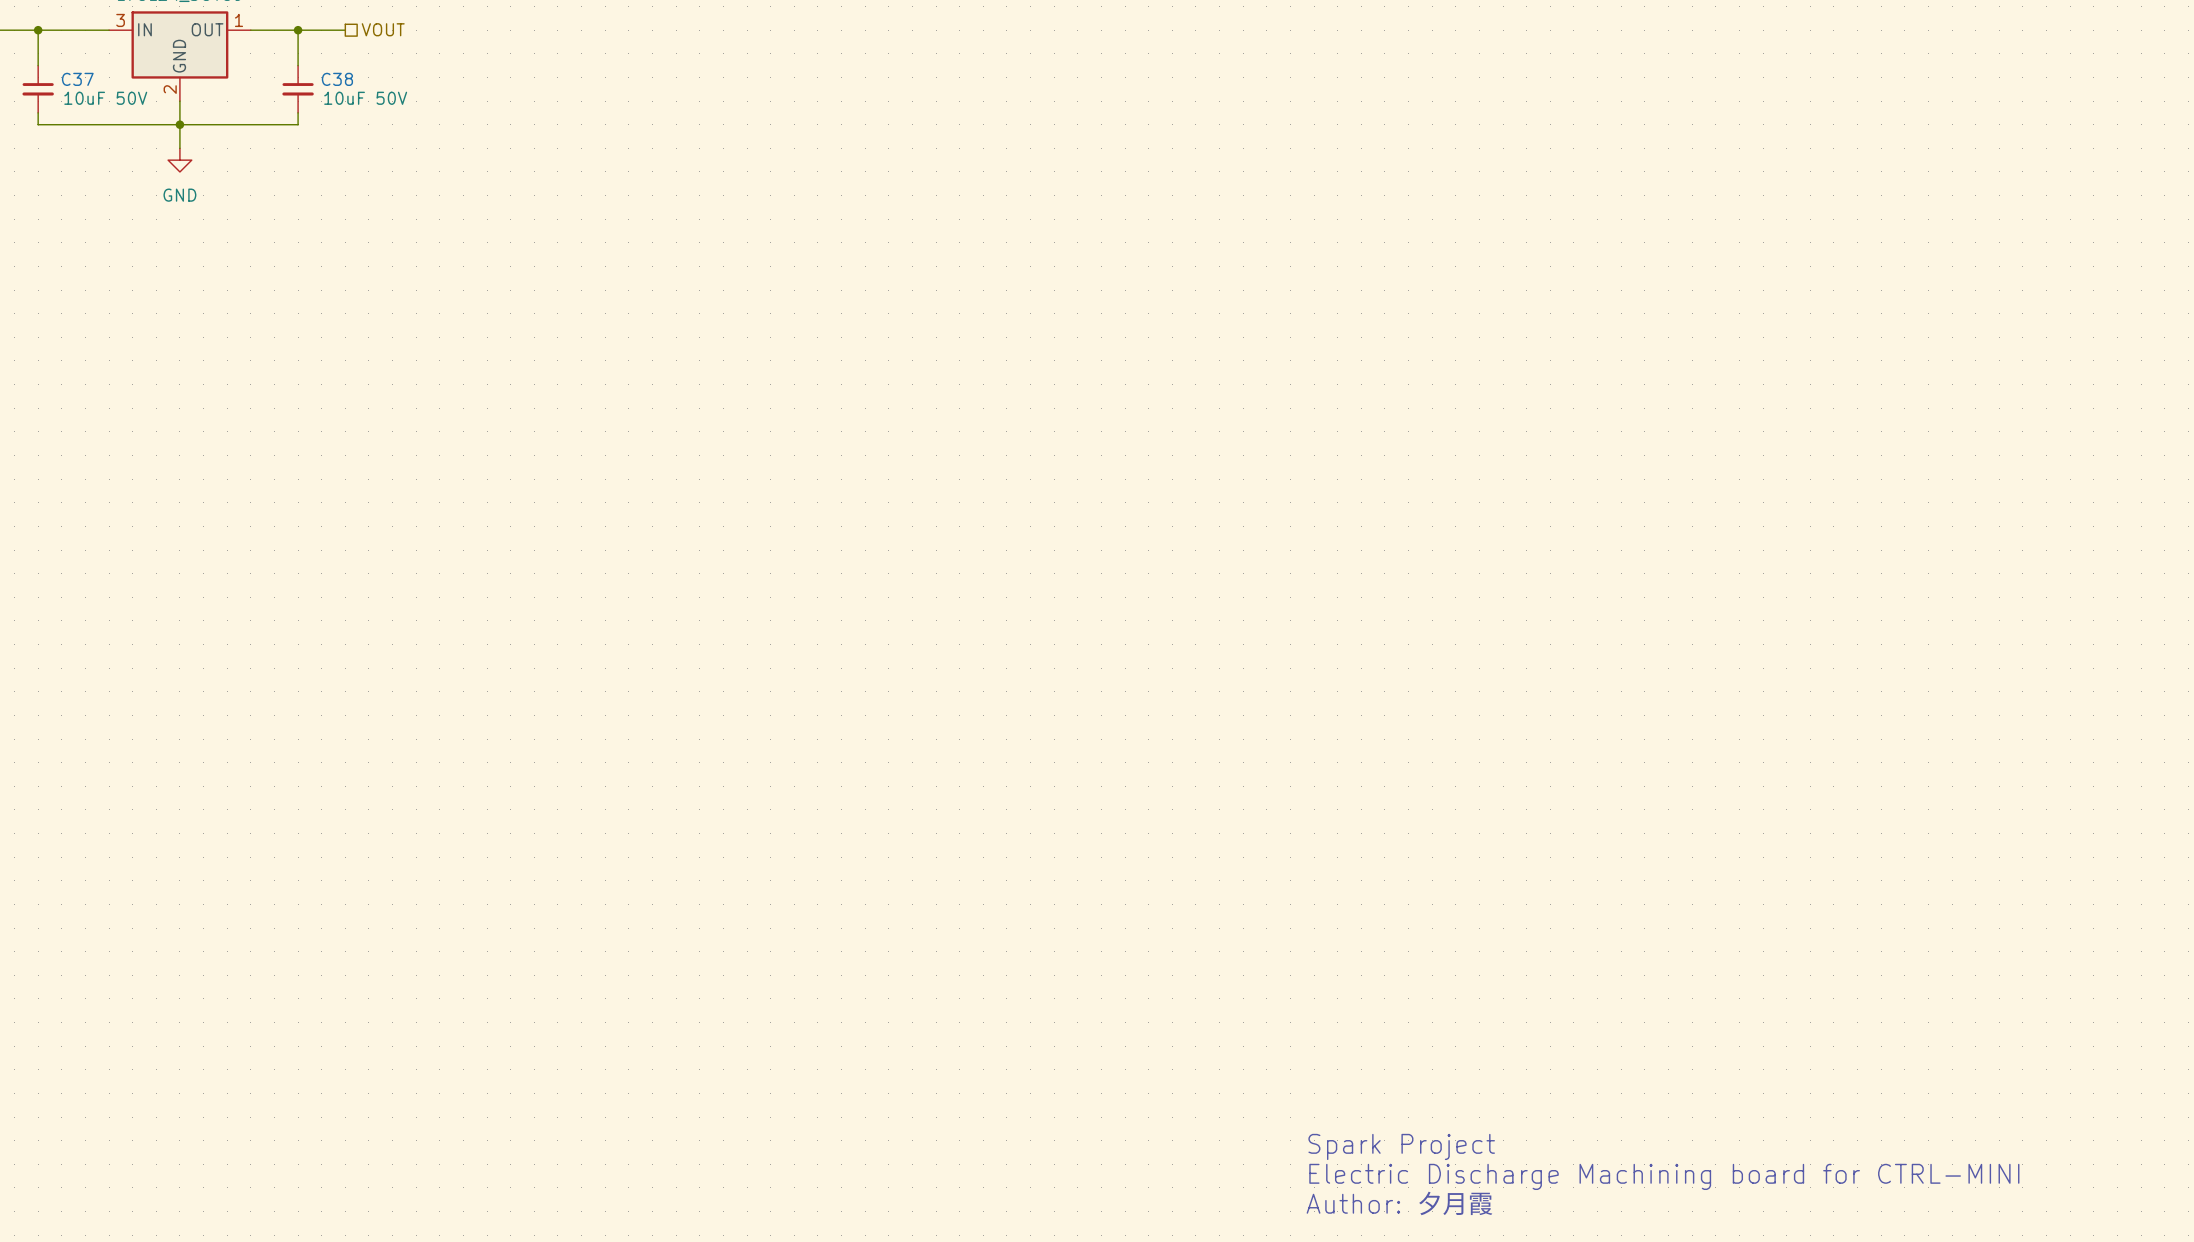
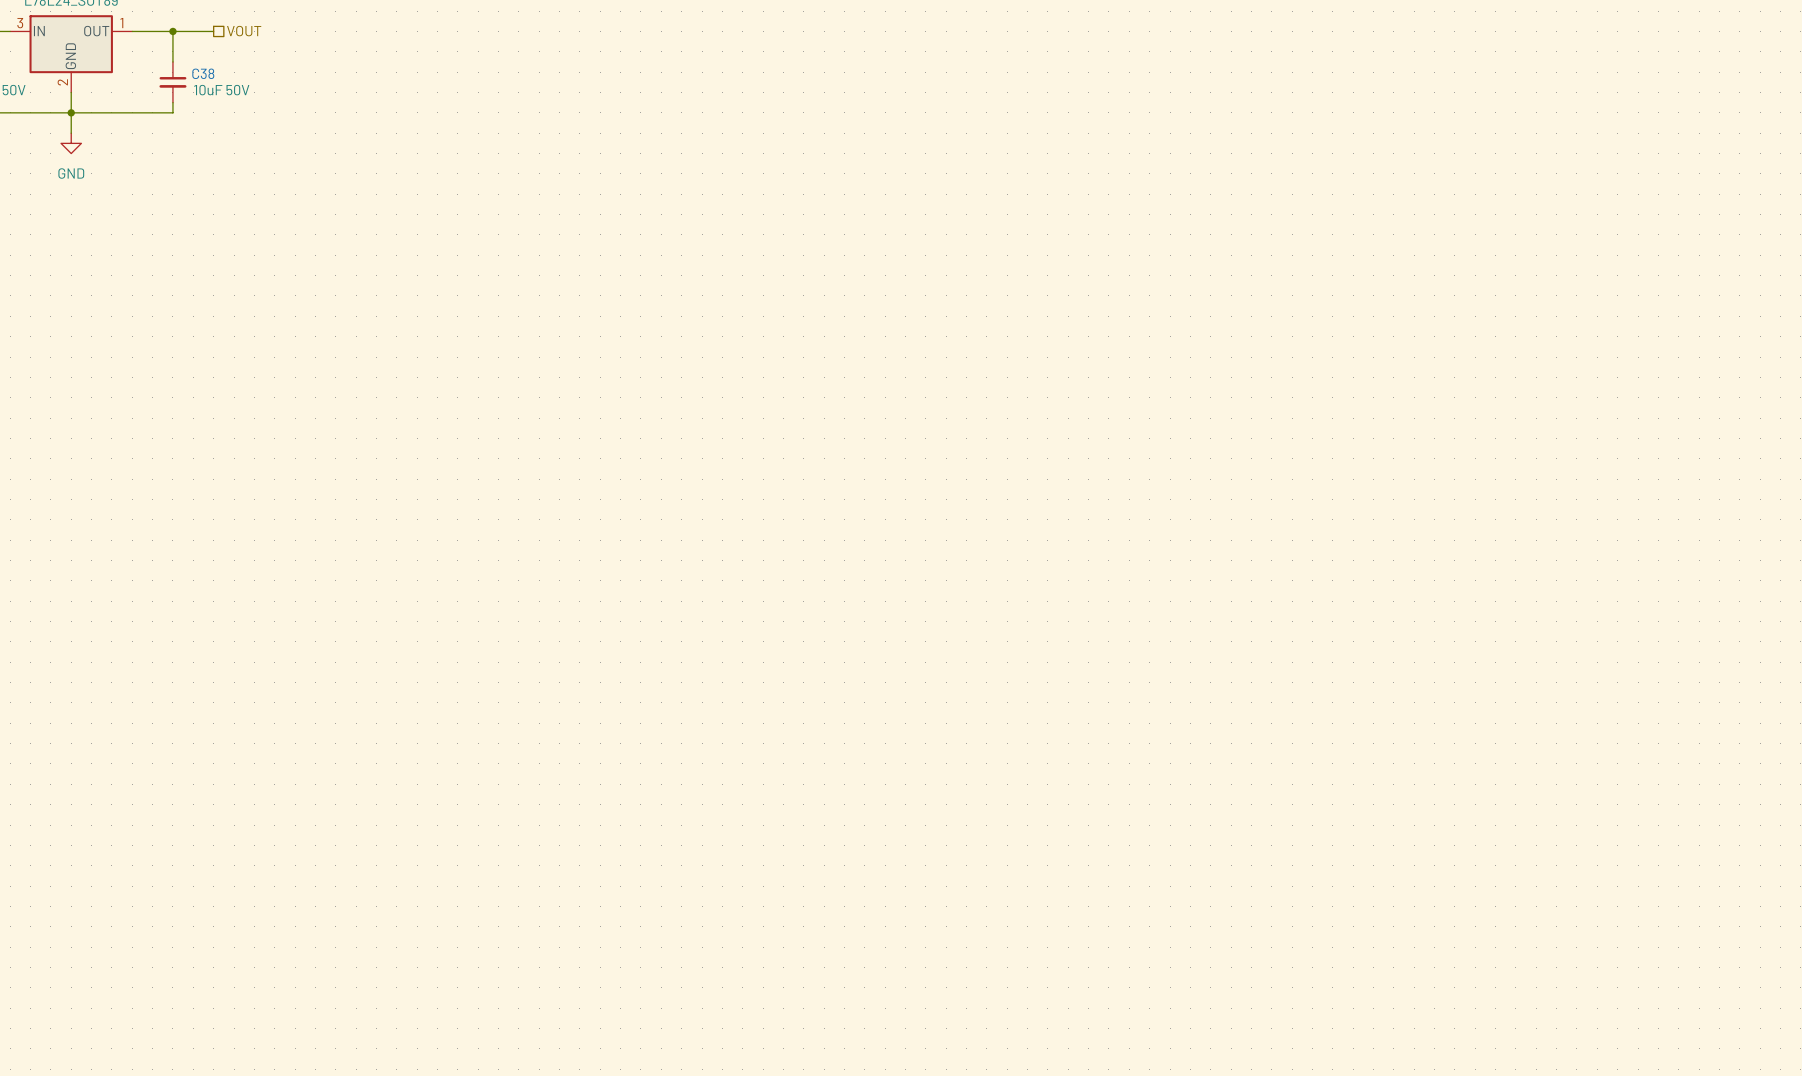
text: Spark Project (1401, 1146) -> none
text: Electric Discharge Machining board for CTRL-MINI (1664, 1176) -> none
text: Author: 夕月霞 (1399, 1203) -> none

